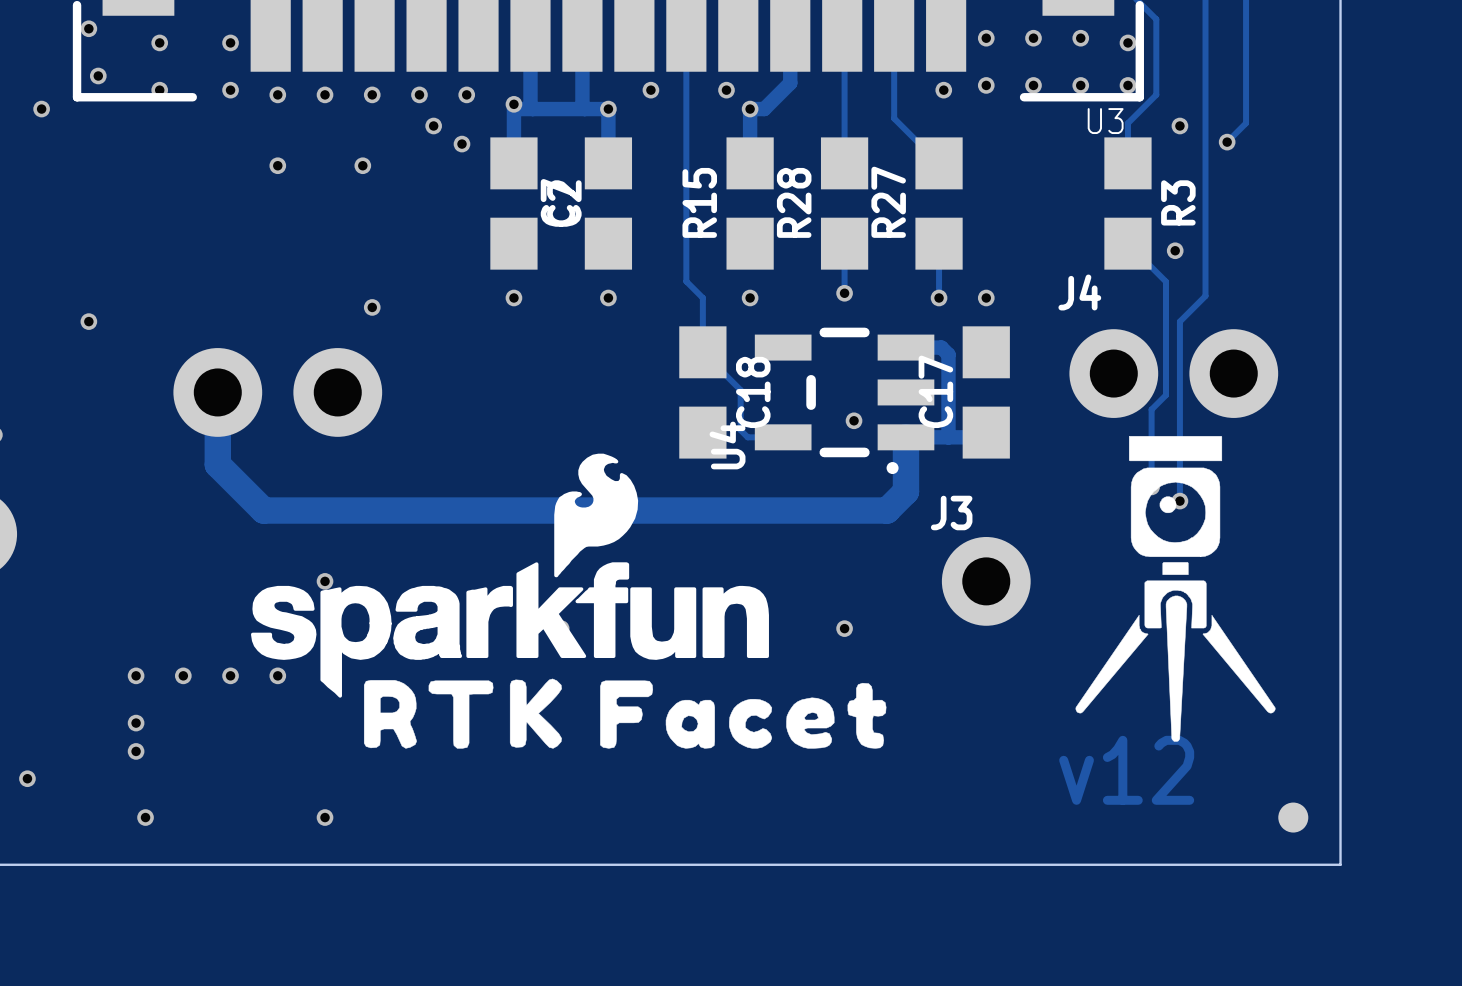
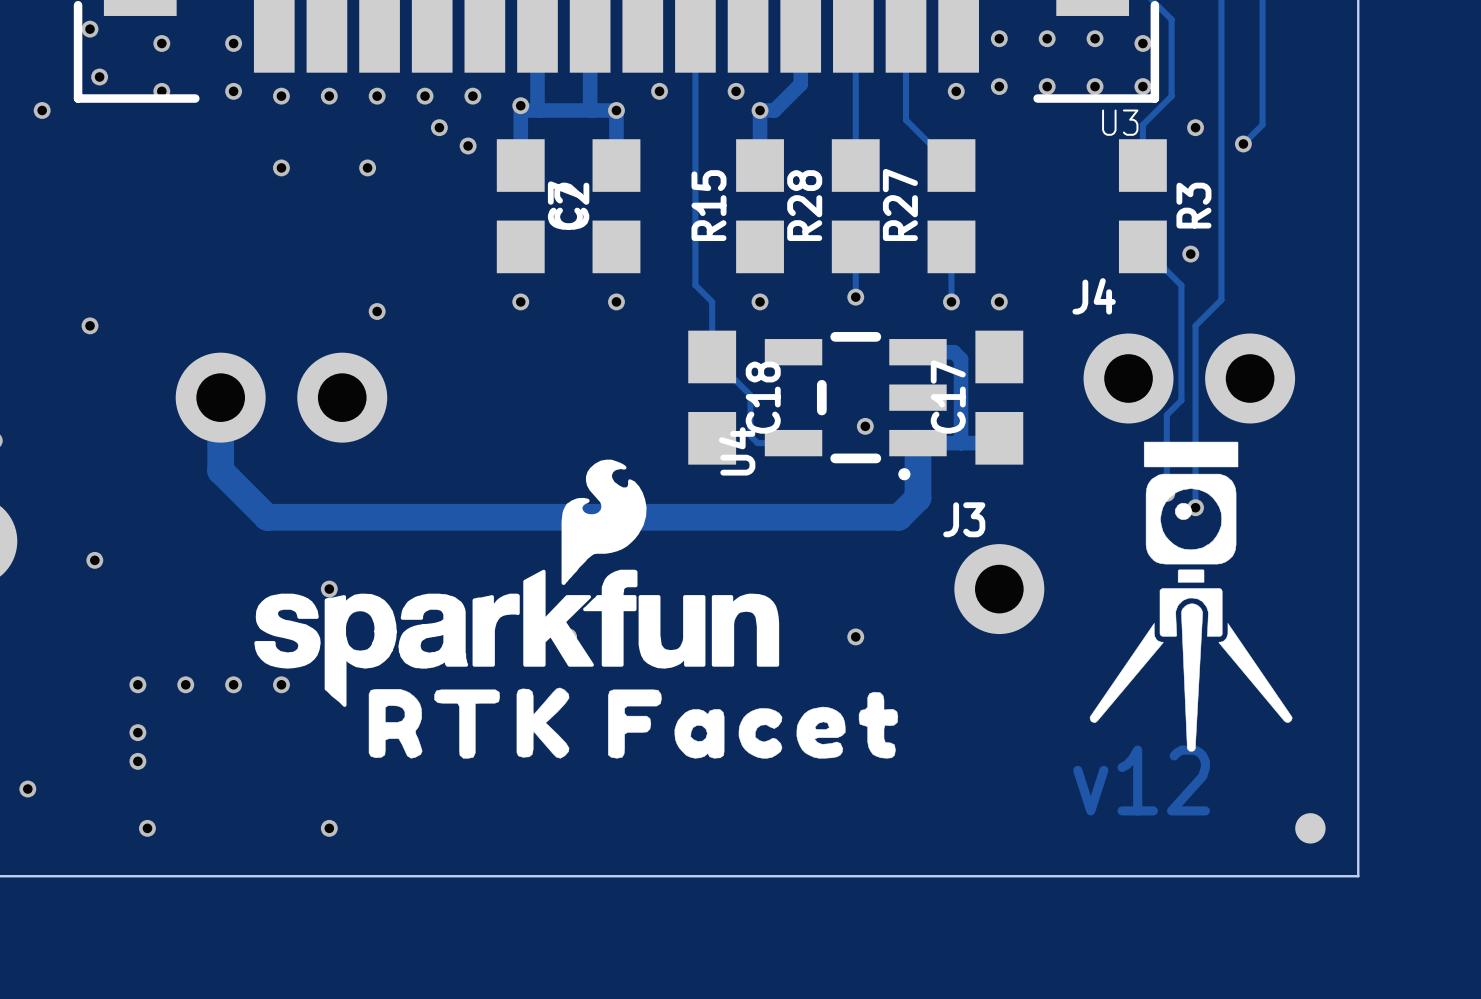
via: none -> (94, 560)

